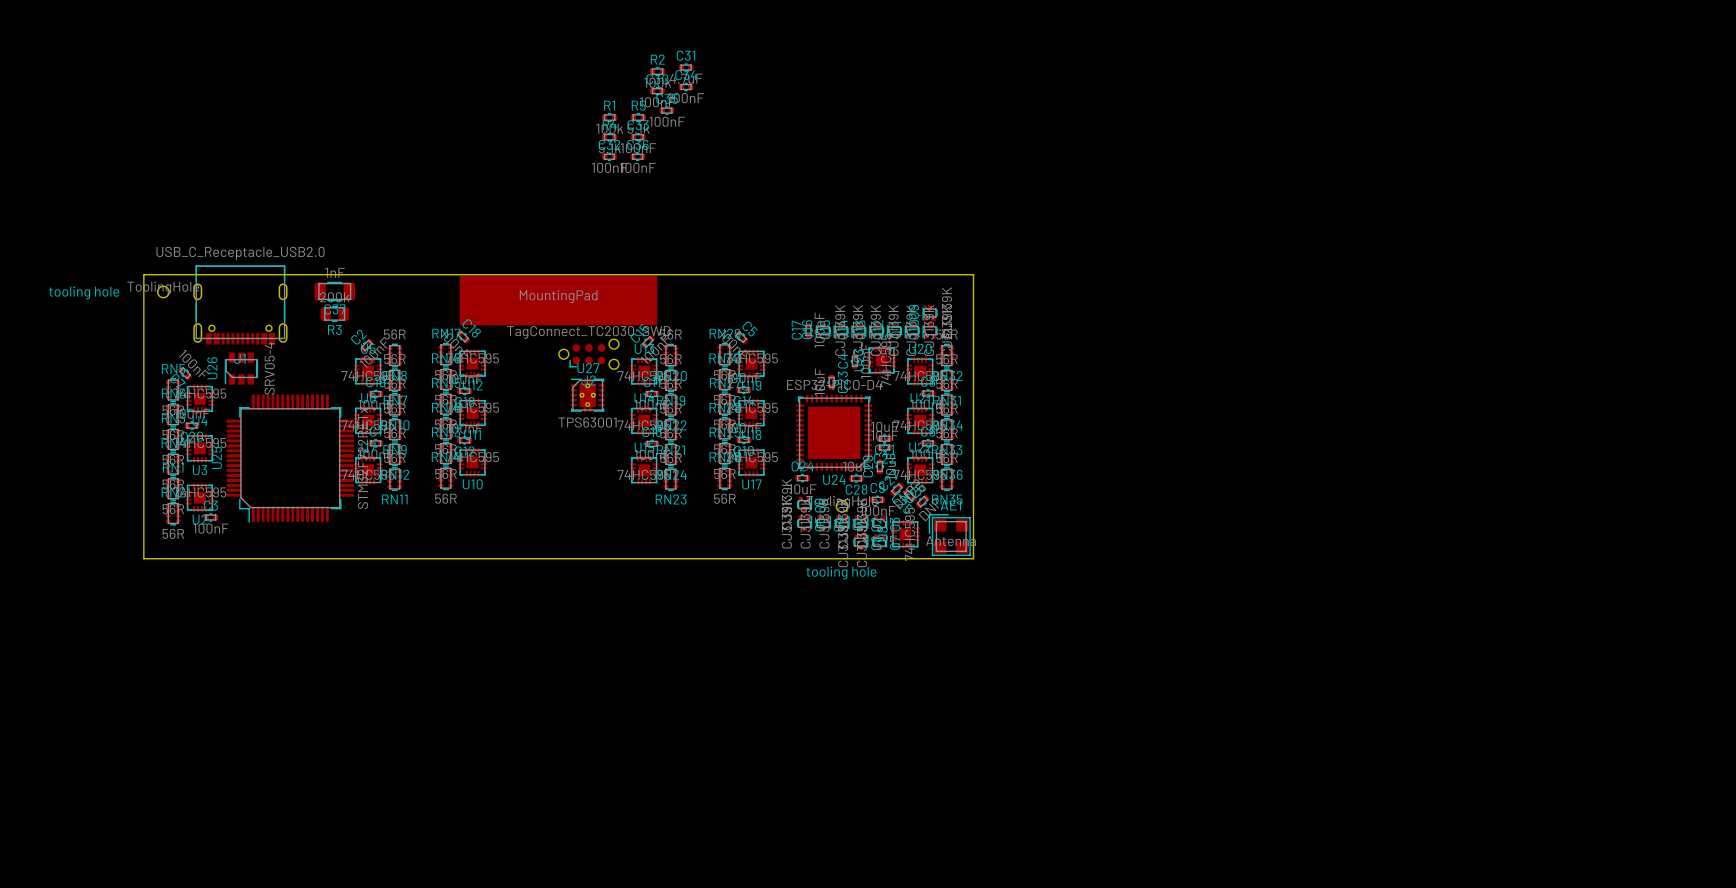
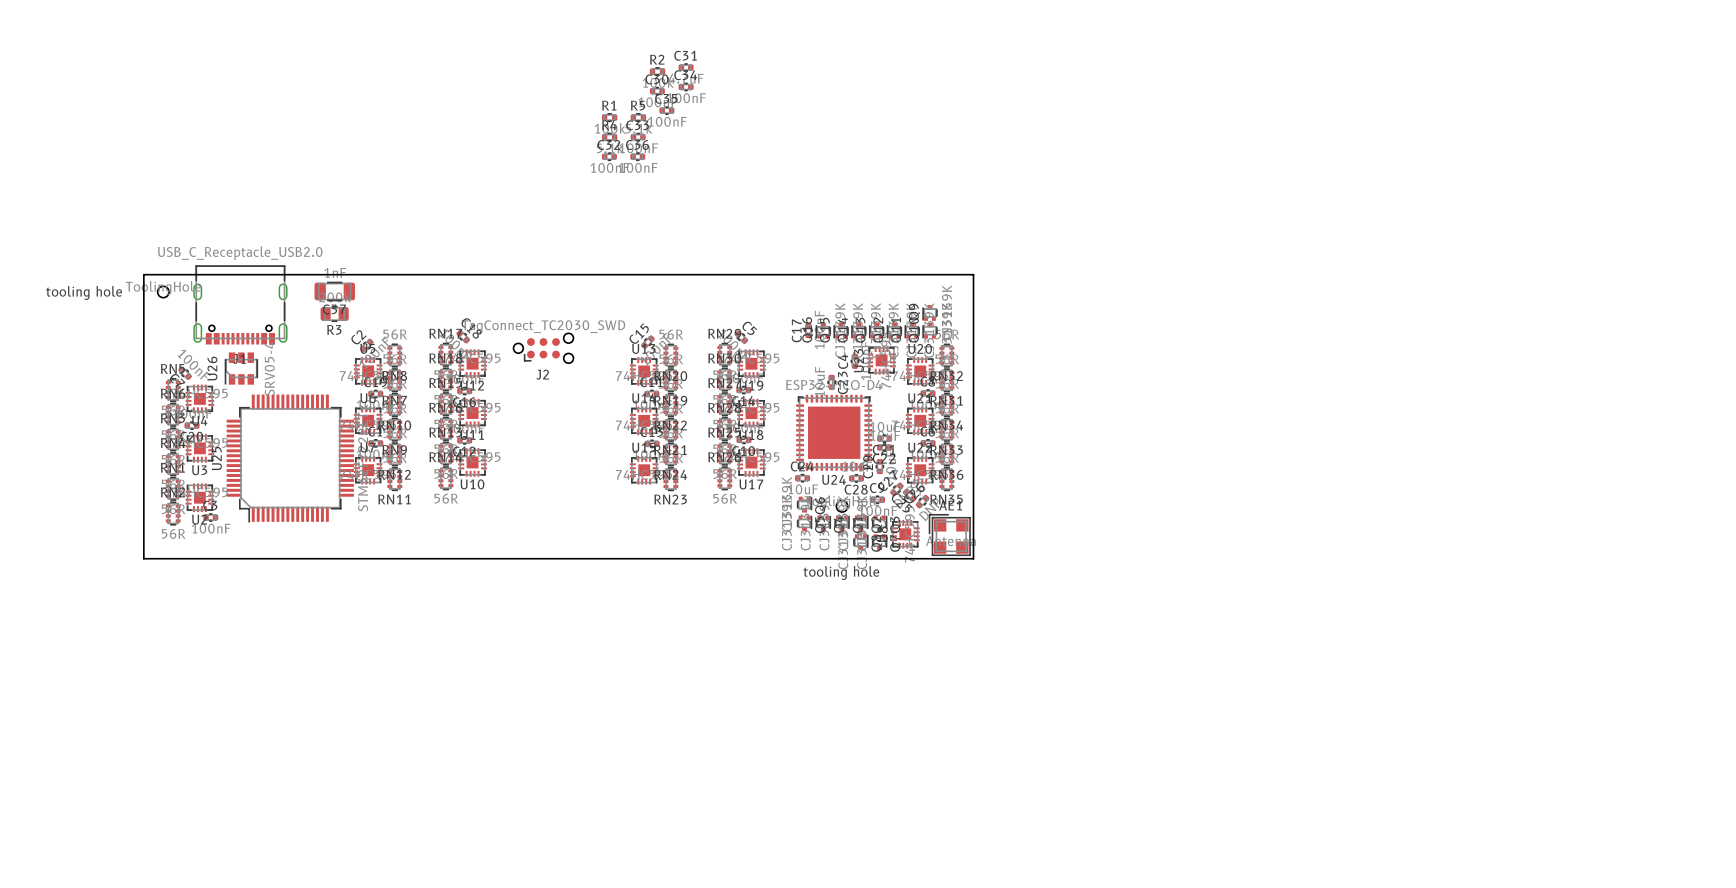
part: MountingPad (558, 300) -> none
J2 position: (588, 354) -> (543, 348)
U27: TPS63001 (587, 395) -> none

